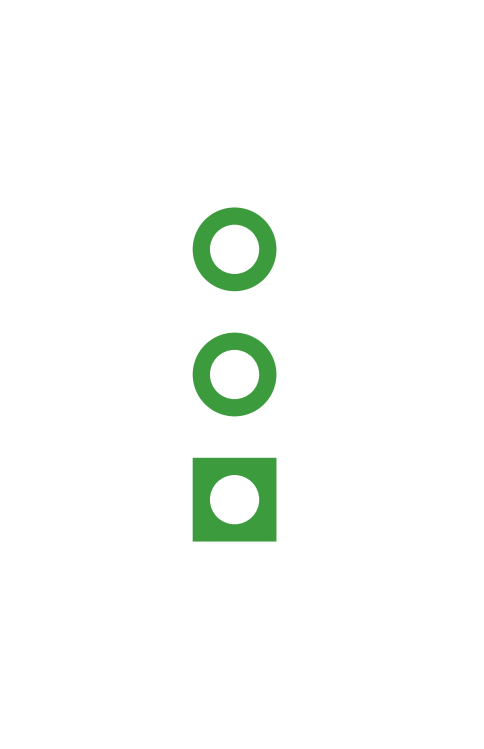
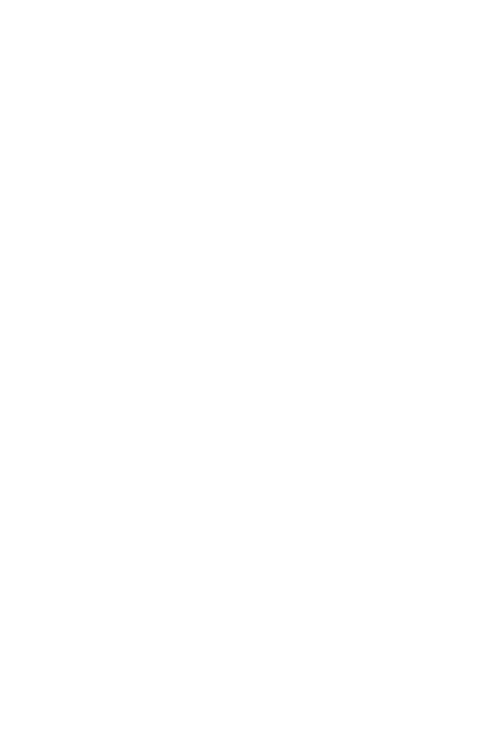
part: (234, 374) -> none

